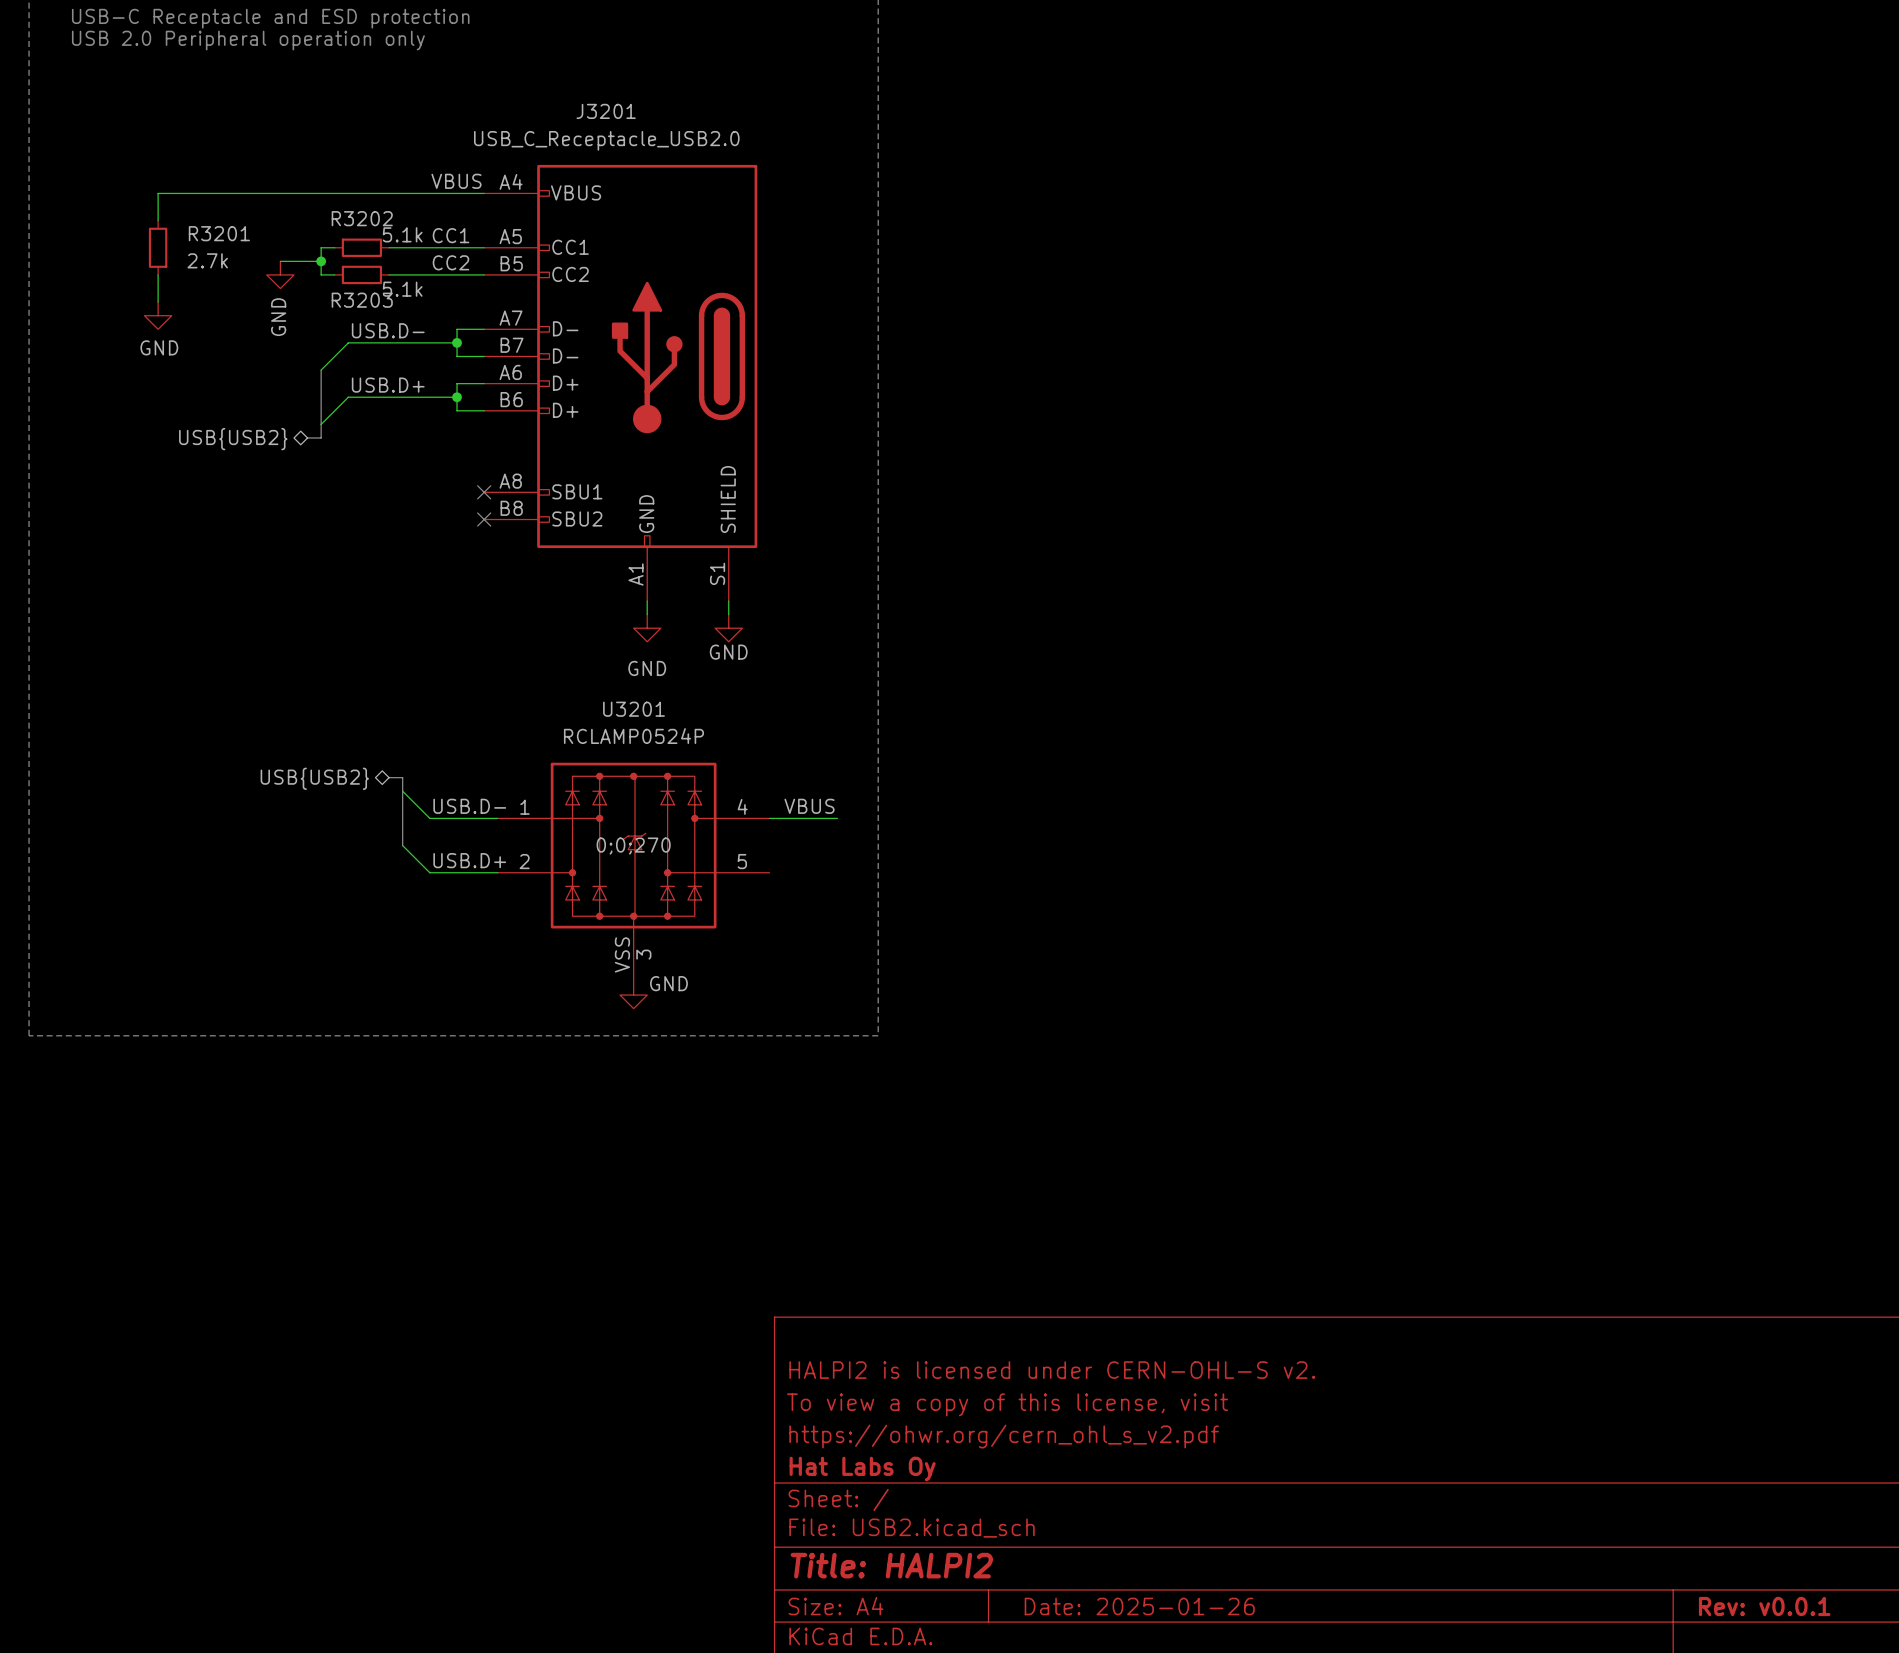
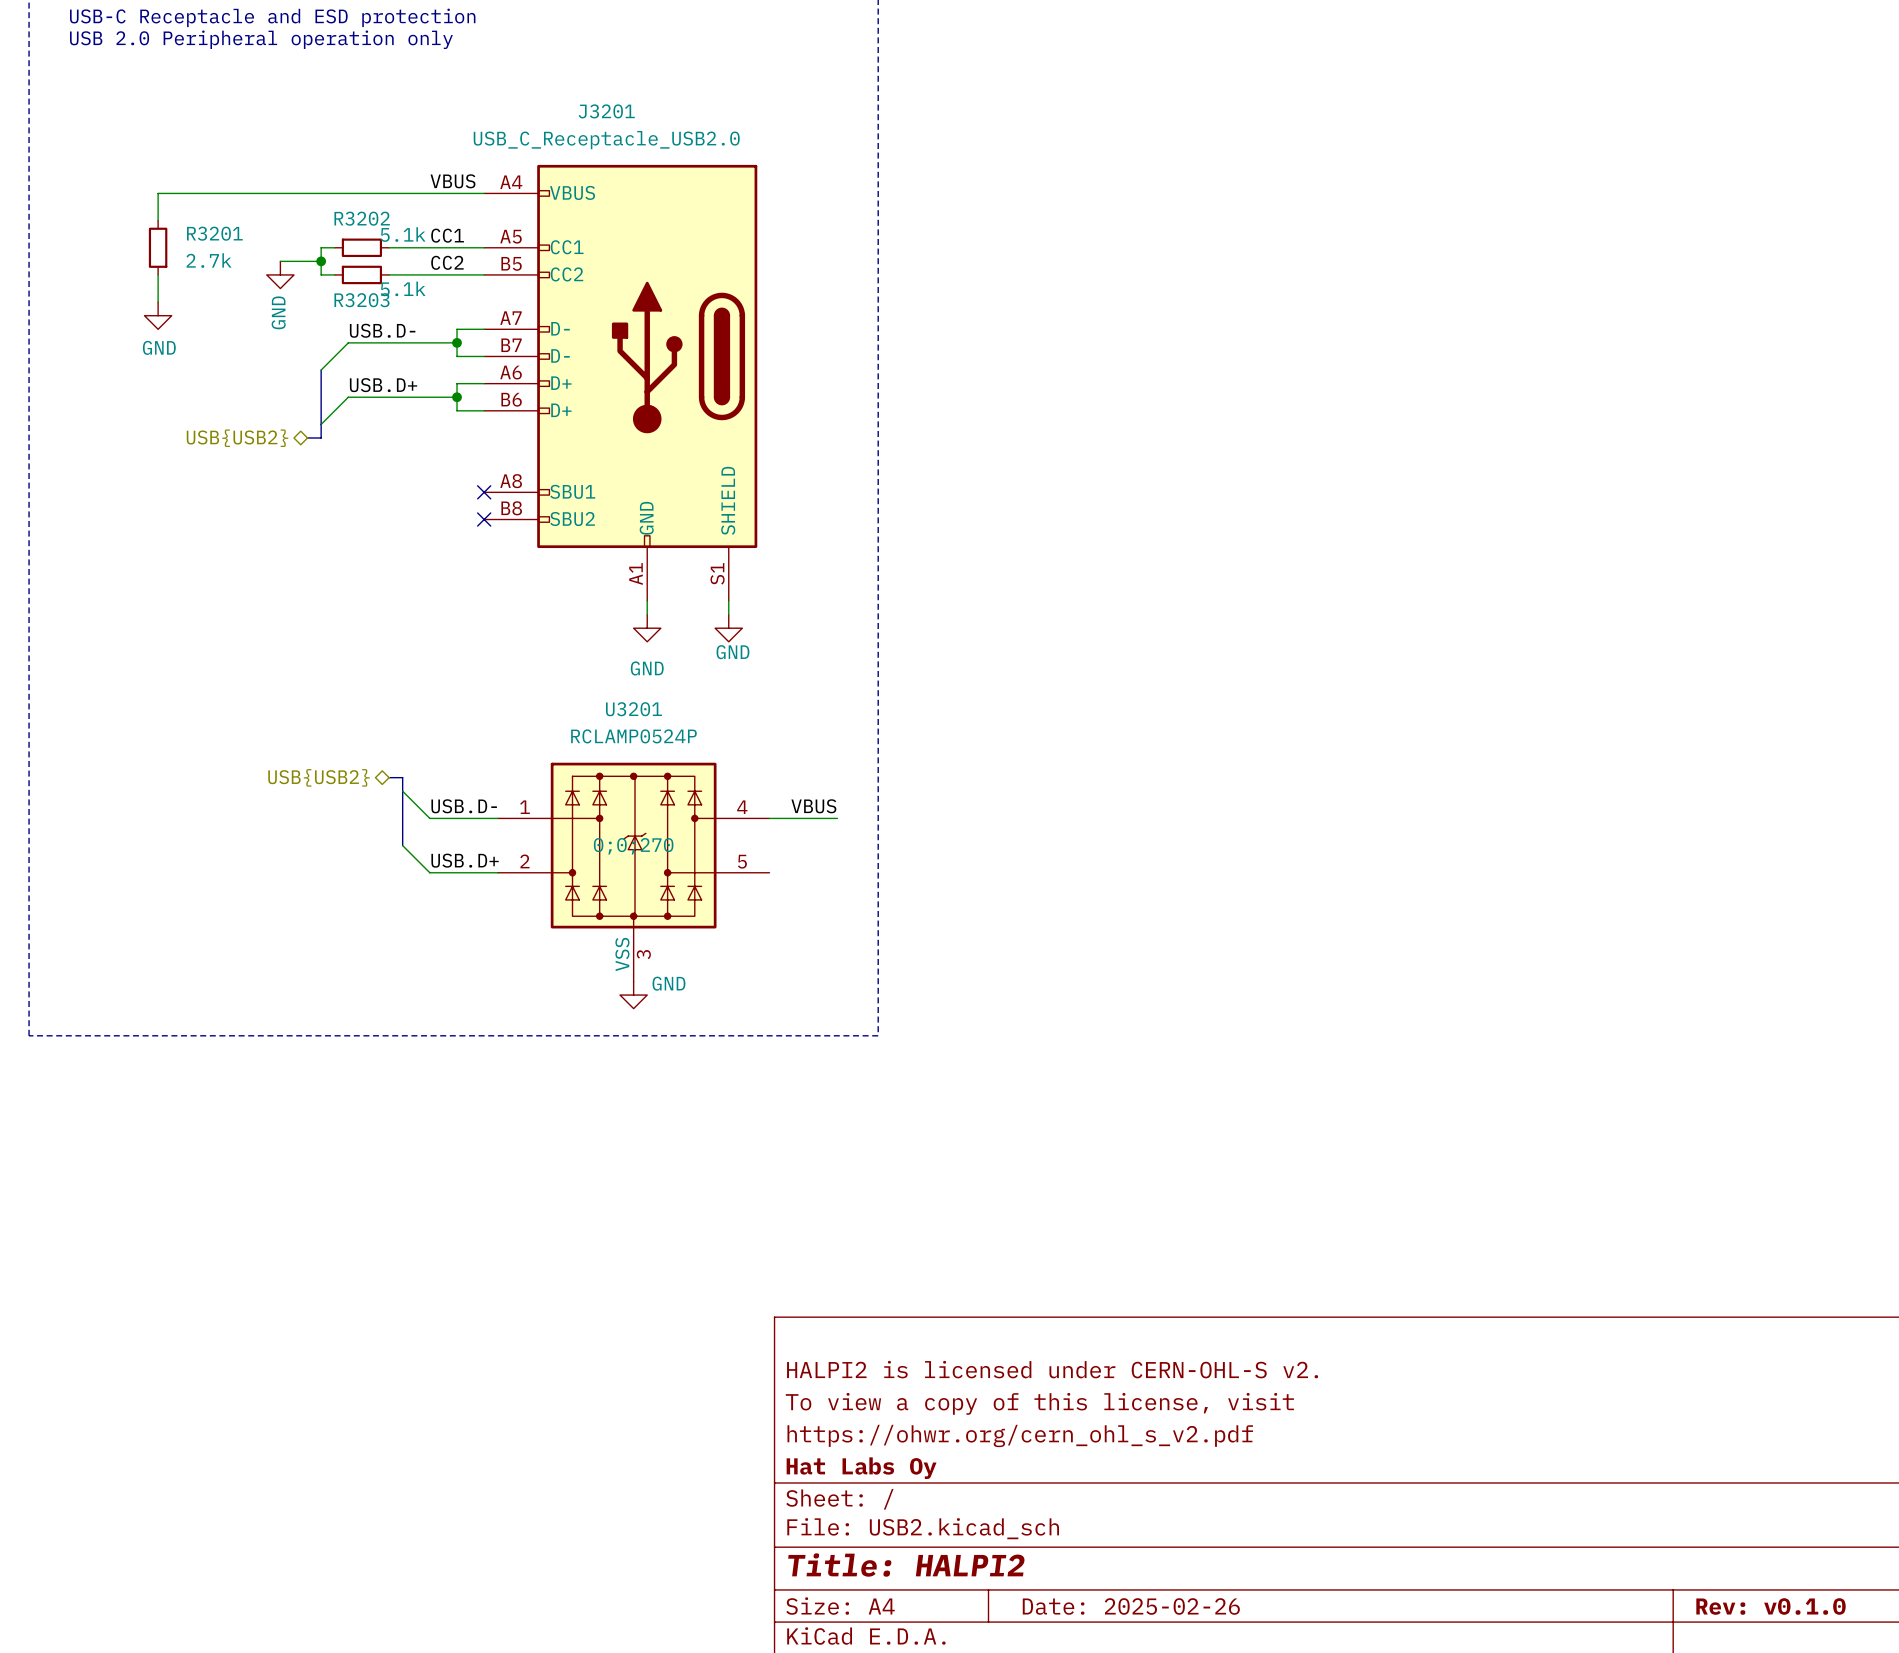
title block: Date: 2025-01-26 (1139, 1606) -> Date: 2025-02-26 (1131, 1606)
title block: Rev: v0.0.1 (1764, 1606) -> Rev: v0.1.0 (1771, 1606)

